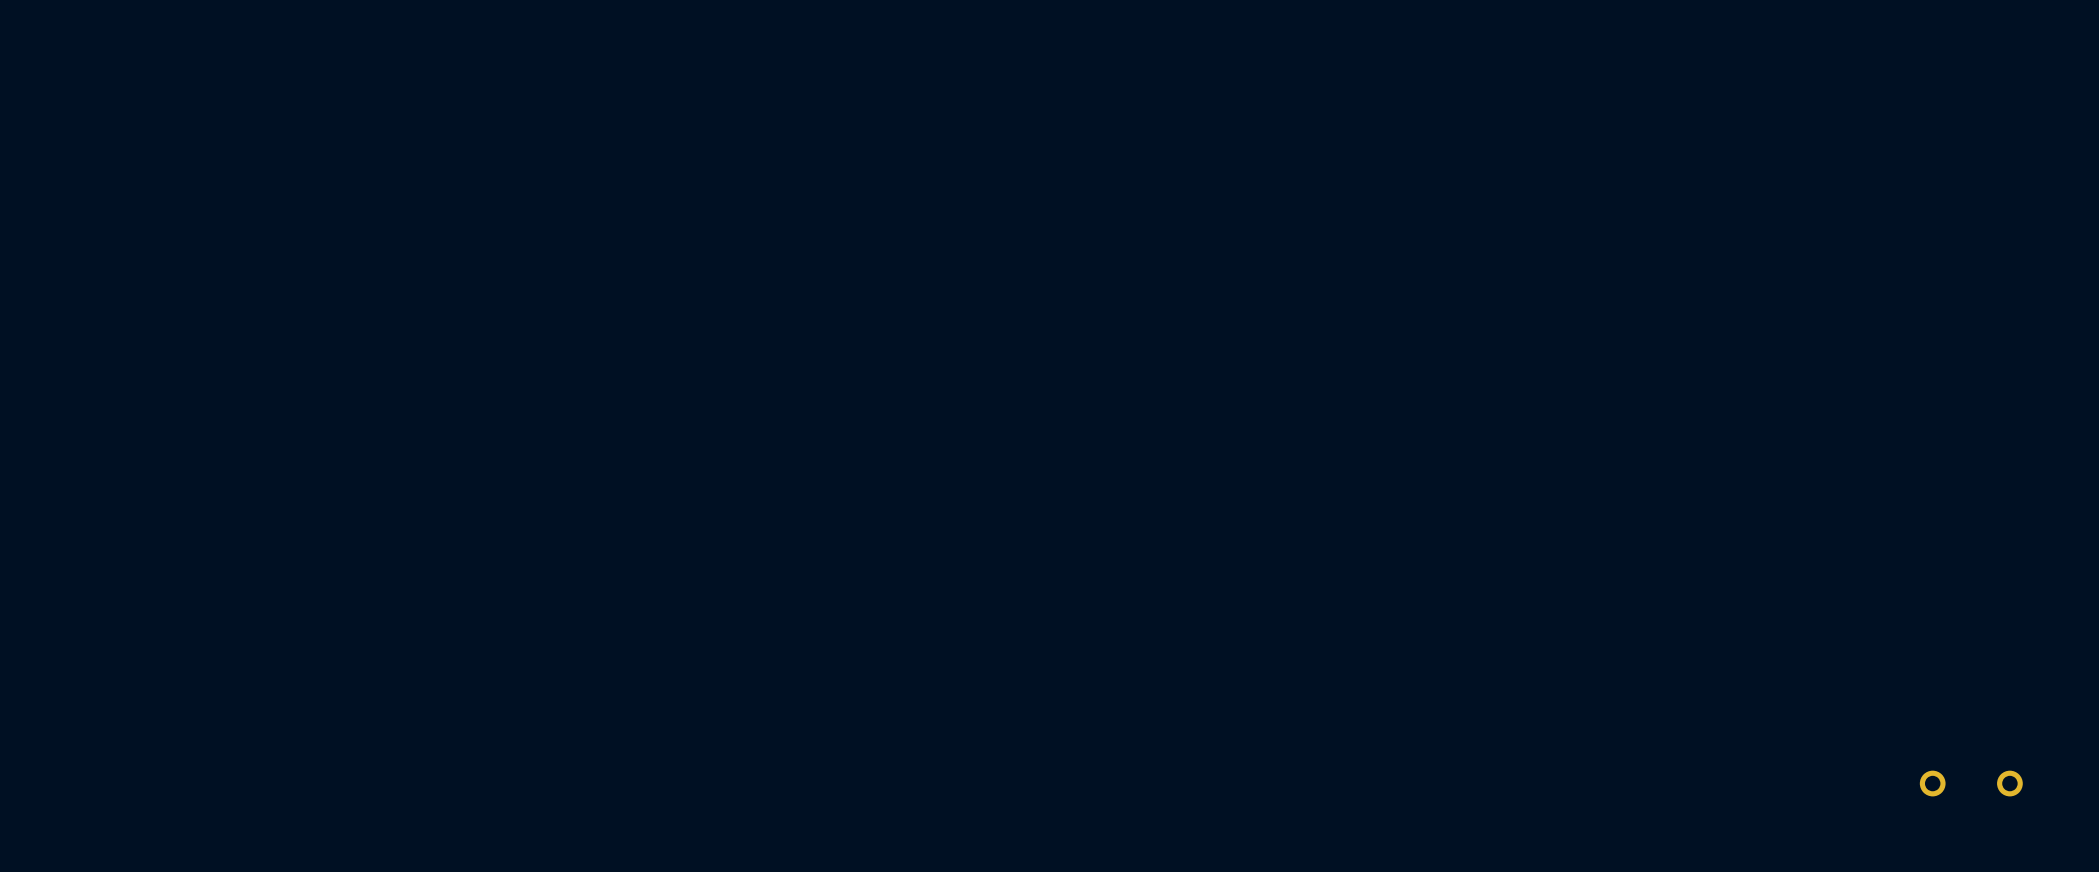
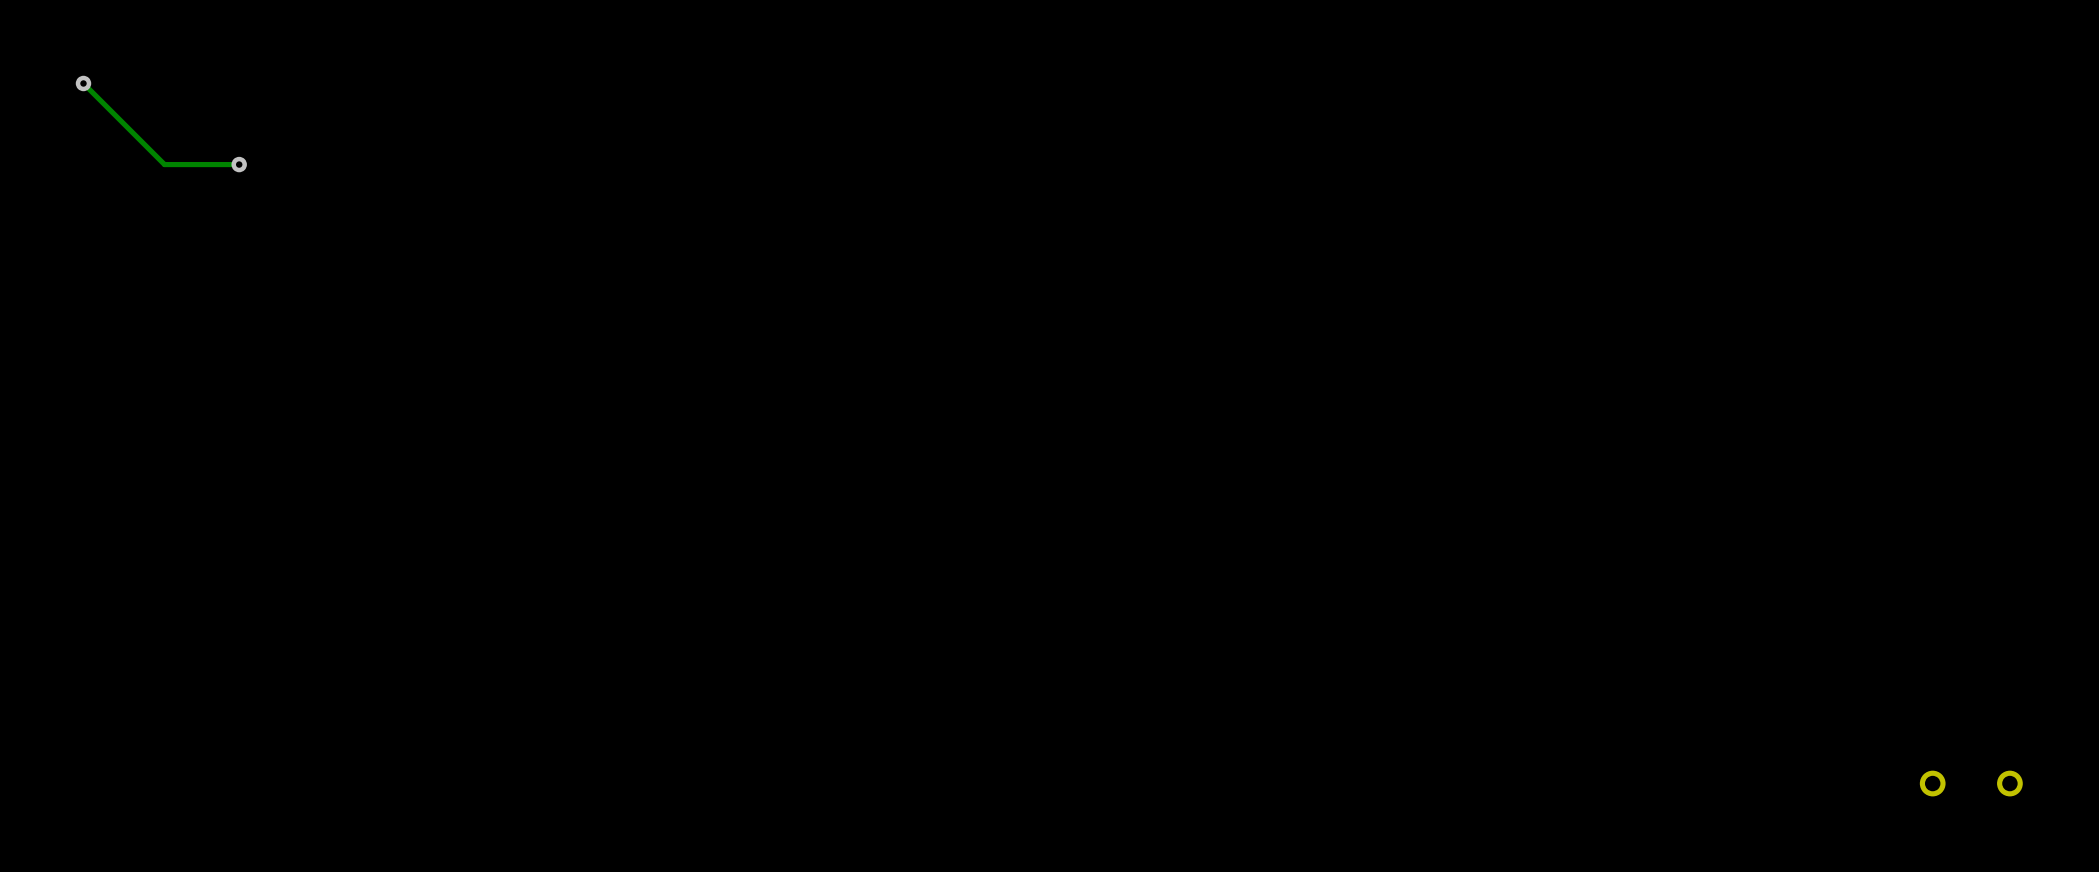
track: none -> (83, 83) (164, 164) (239, 164)
via: none -> (83, 83)
via: none -> (239, 164)

